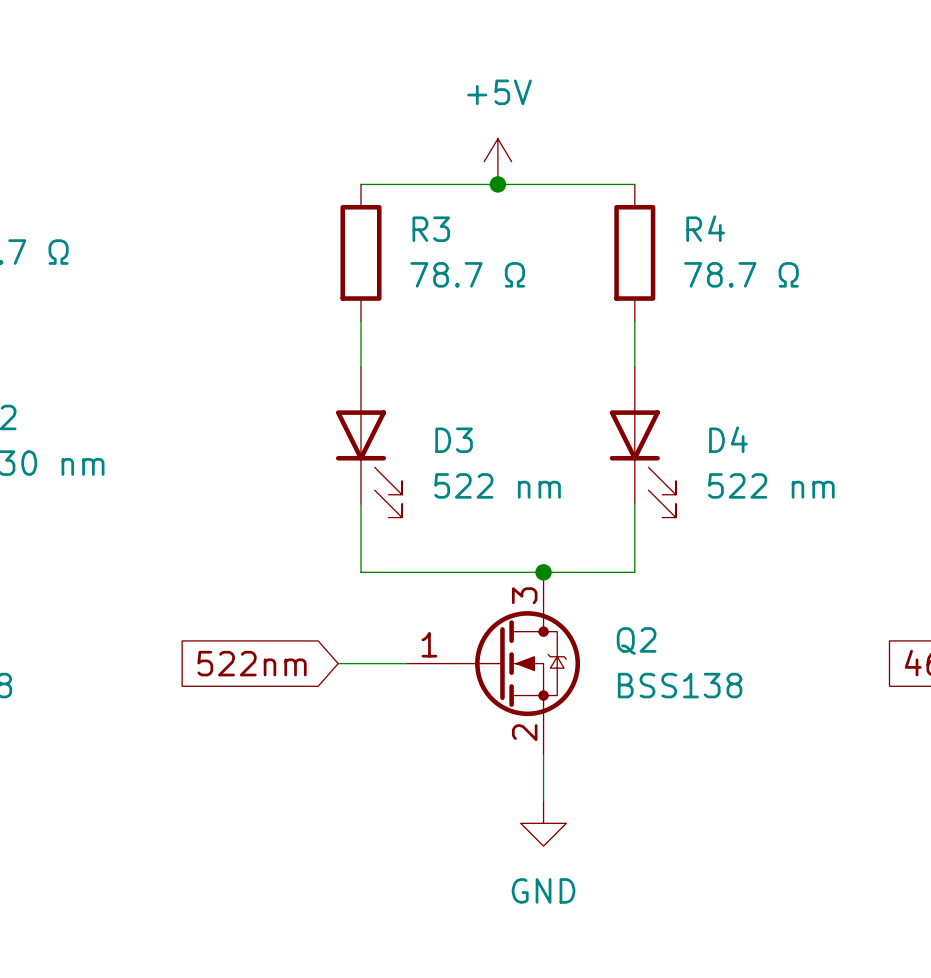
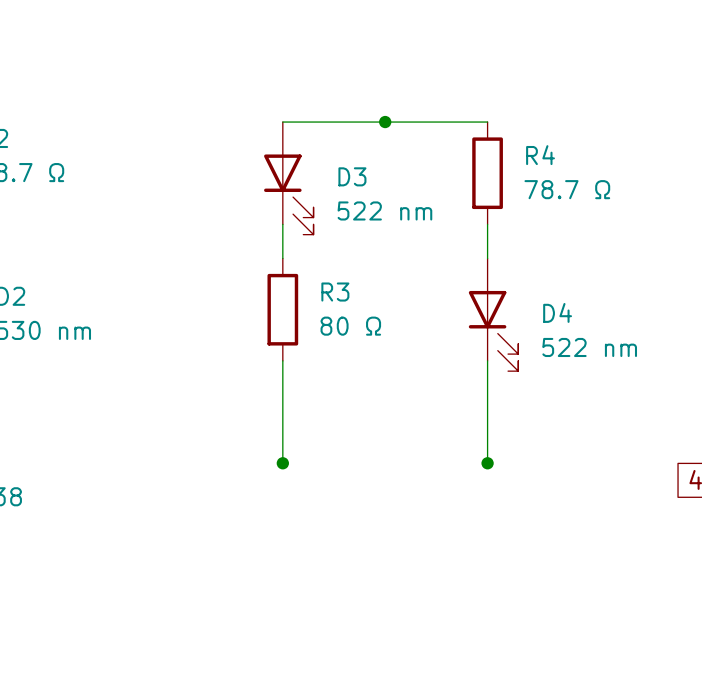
power symbol: +5V (497, 161) -> none
R3 position: (361, 252) -> (282, 309)
R3 value: 78.7 Ω (467, 274) -> 80 Ω (350, 326)
D3 position: (368, 442) -> (288, 178)
wire: (361, 572) (634, 572) -> (282, 412) (282, 463)
junction: (543, 572) -> none
wire: none -> (487, 412) (487, 463)
junction: none -> (282, 463)
junction: none -> (487, 463)
global label: 522nm (252, 663) -> none
wire: (338, 663) (406, 663) -> none
Q2: BSS138 (493, 663) -> none
wire: (543, 754) (543, 800) -> none
power symbol: GND (543, 823) -> none

